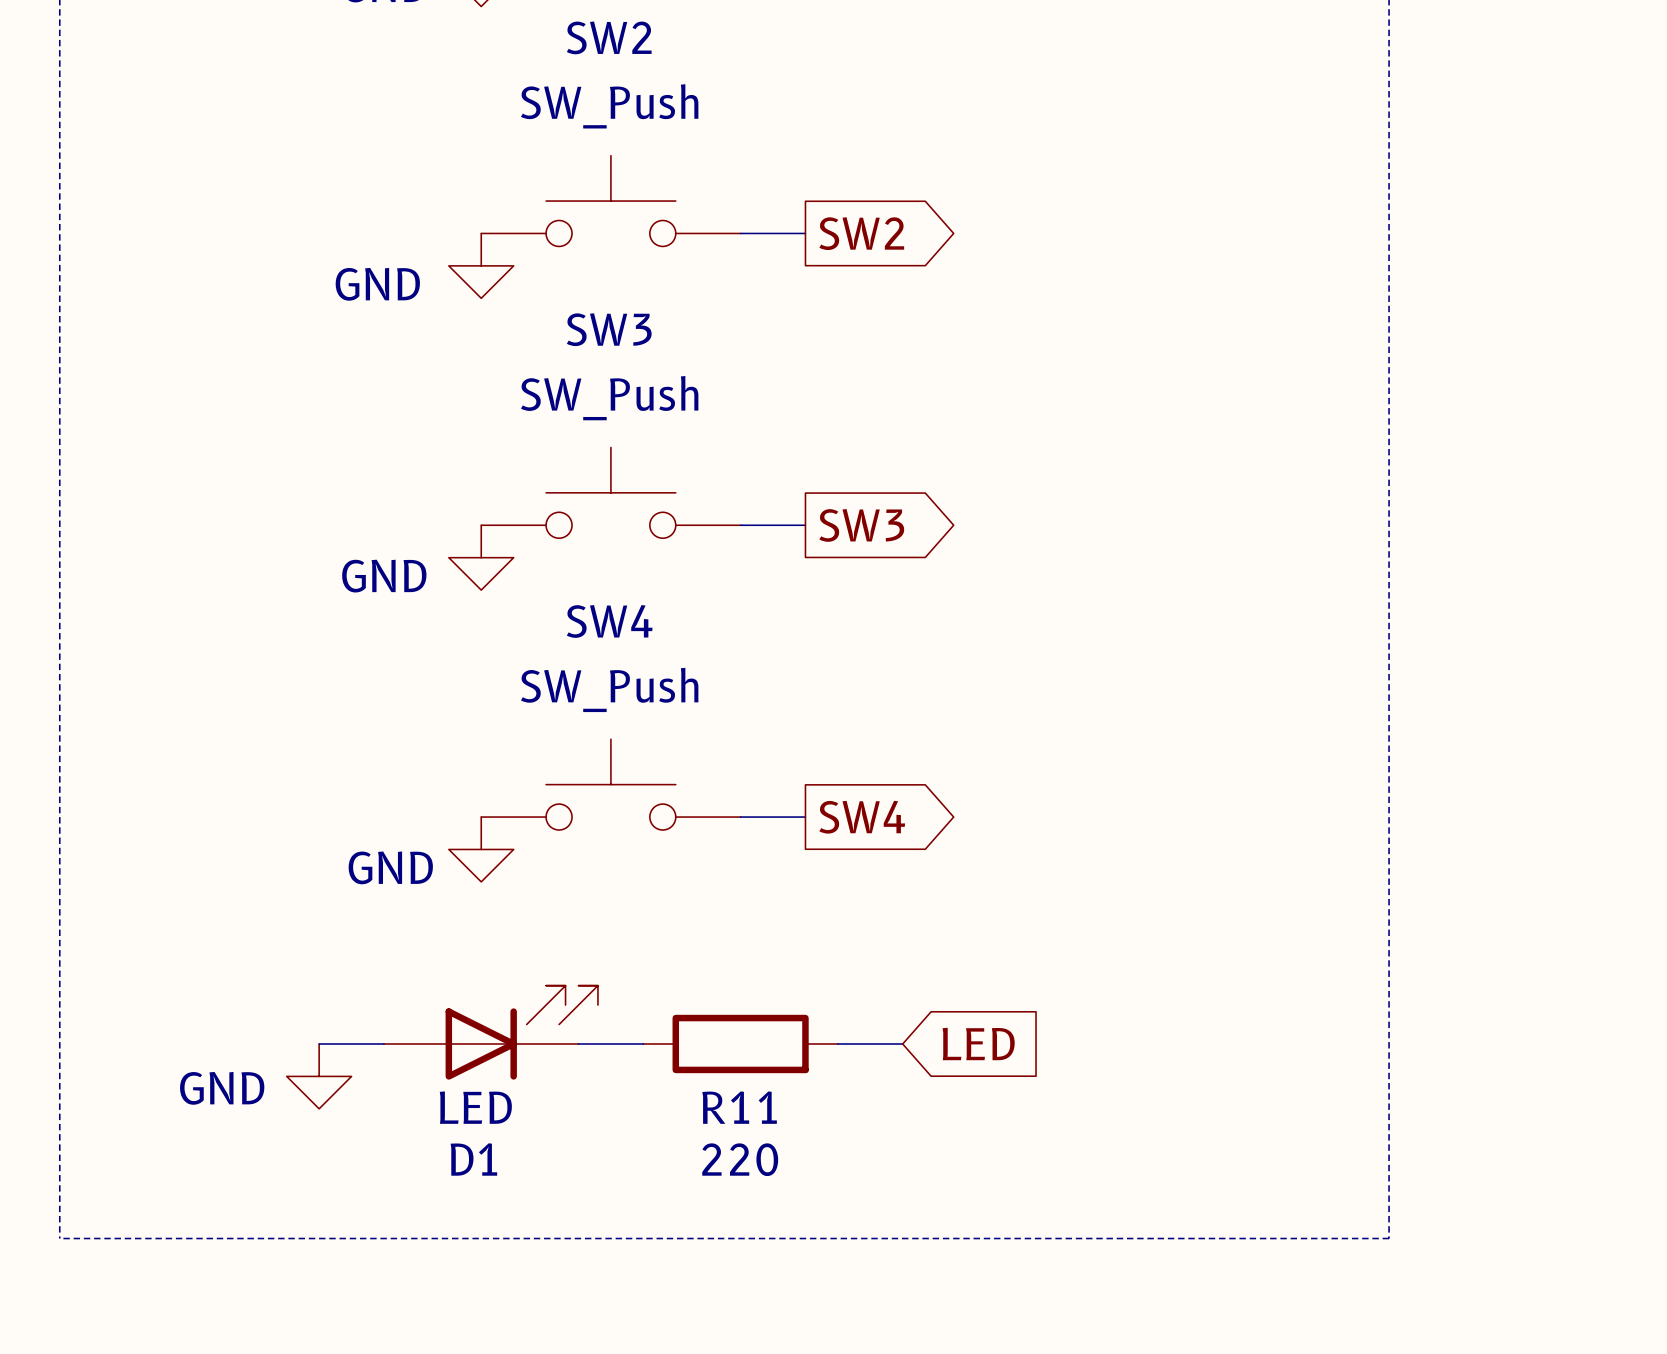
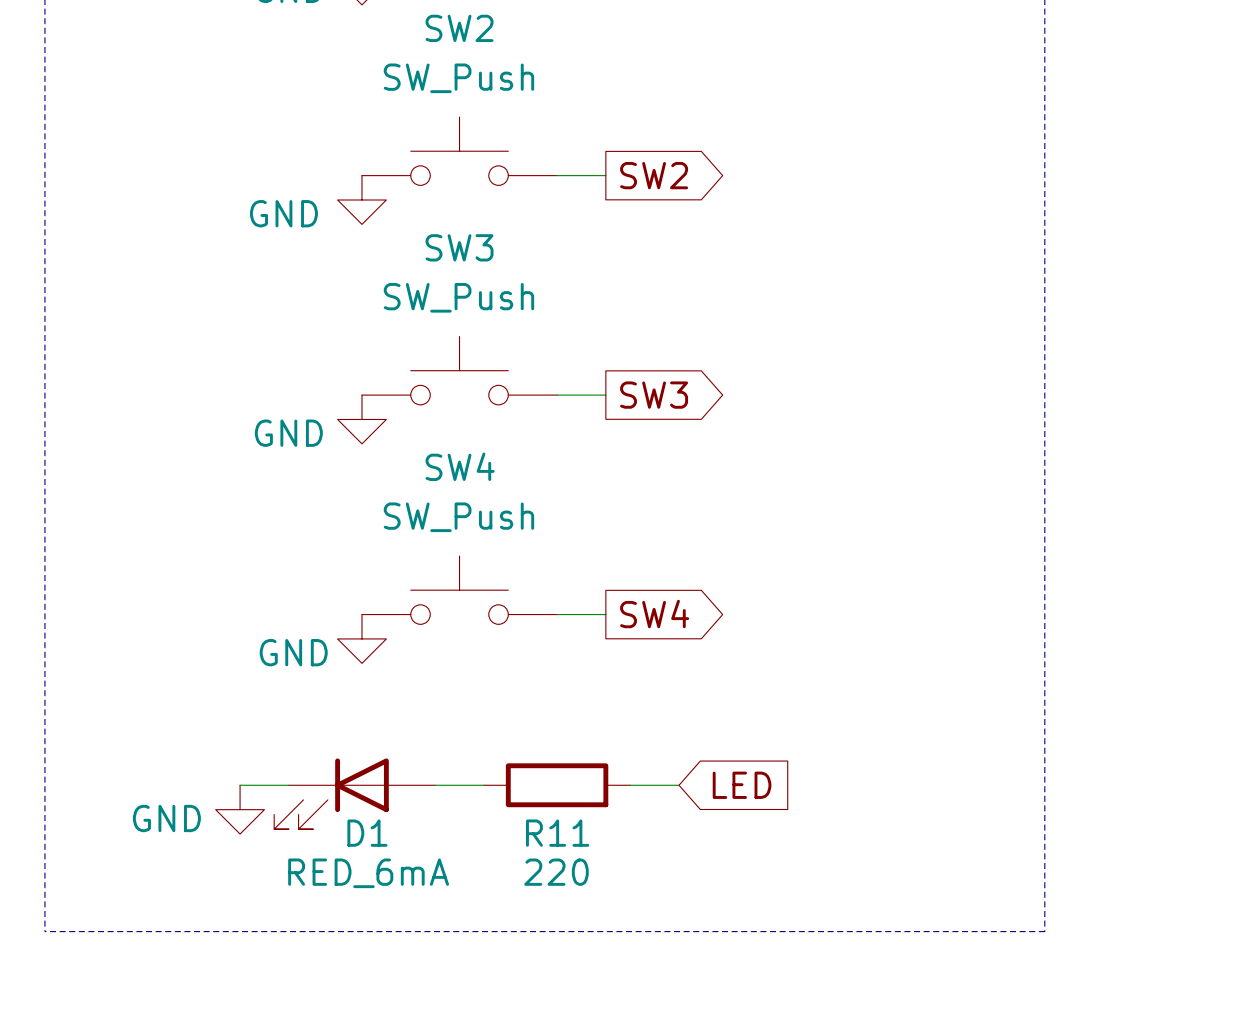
D1 rotation: 0° (521, 1032) -> 180° (331, 793)
D1 value: LED (475, 1107) -> RED_6mA (368, 873)
D1 name position: D1 (473, 1159) -> D1 (367, 833)

